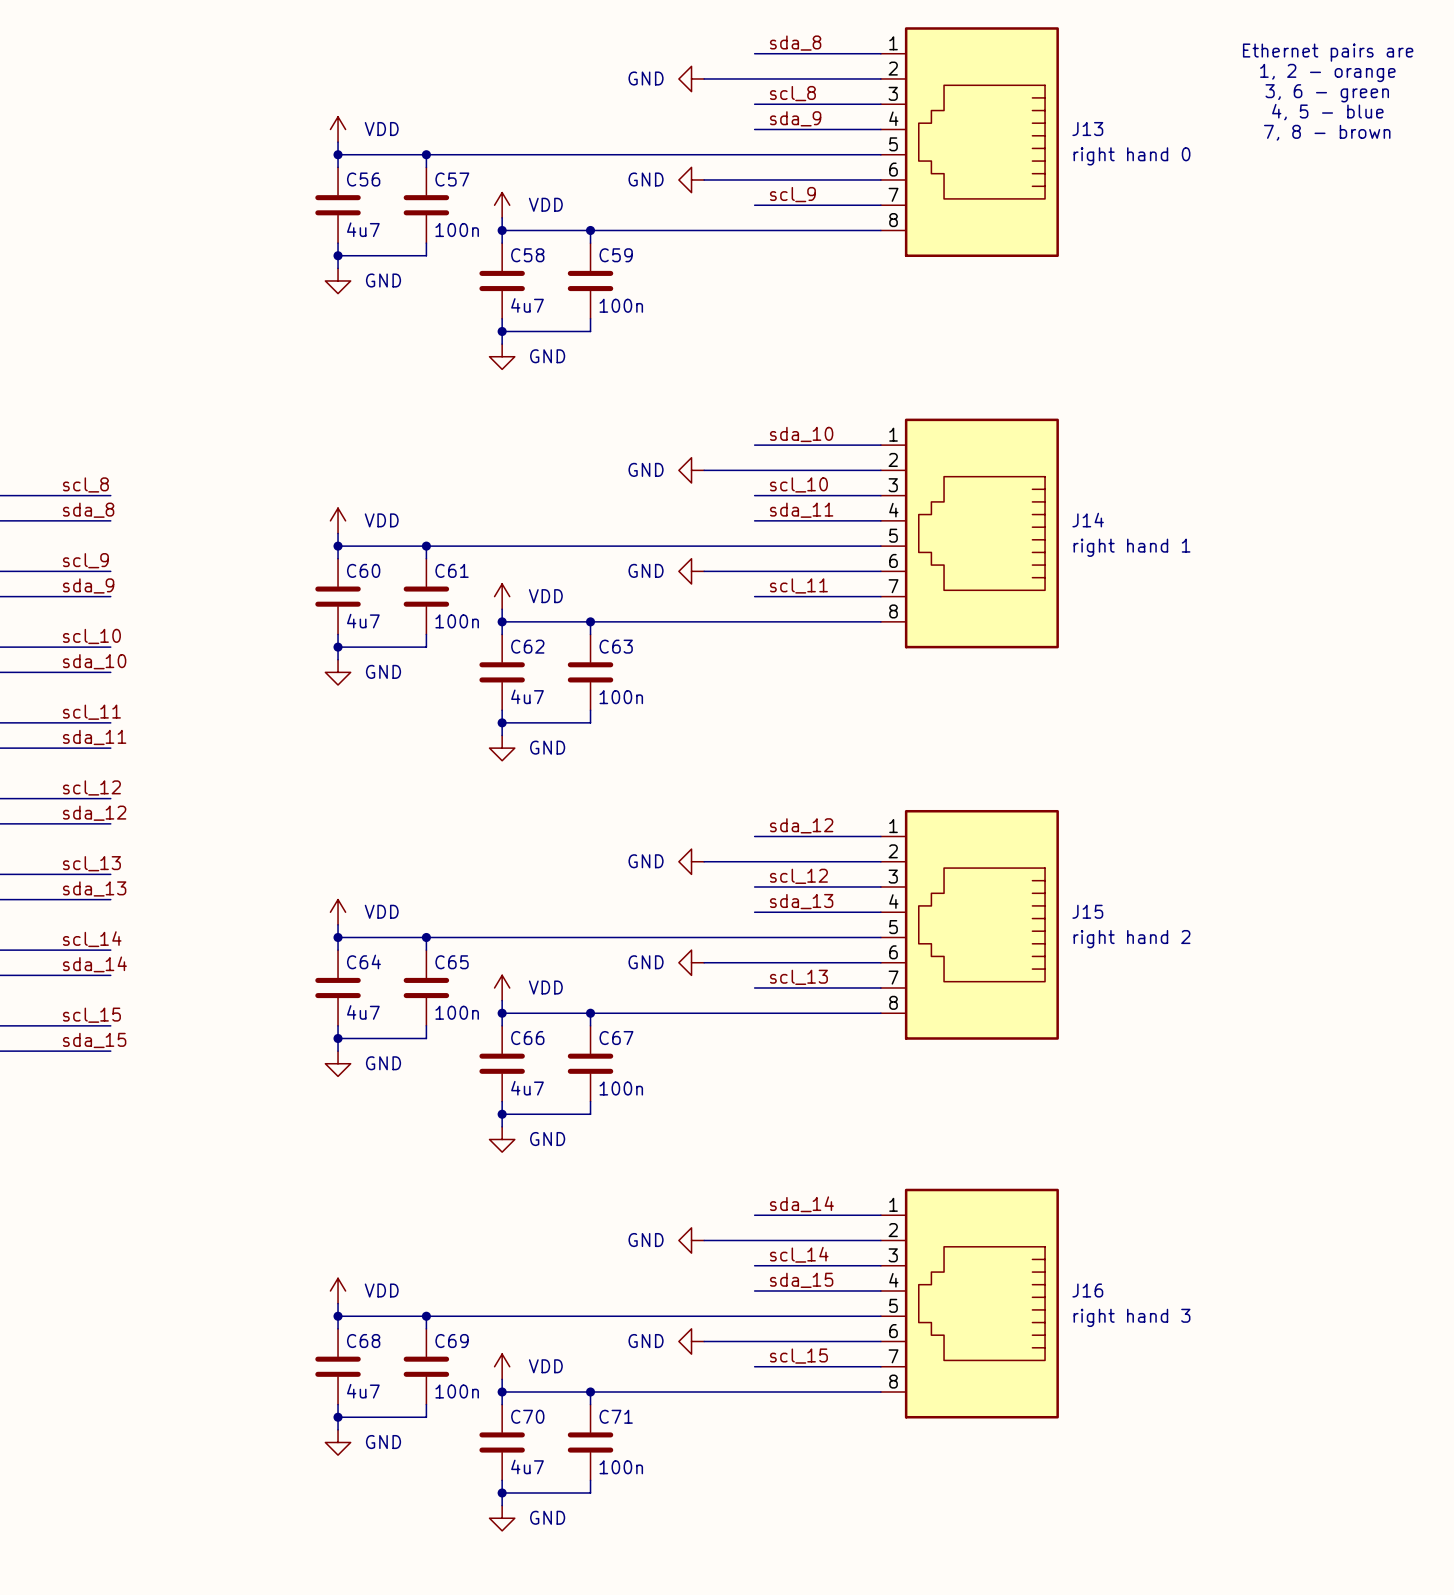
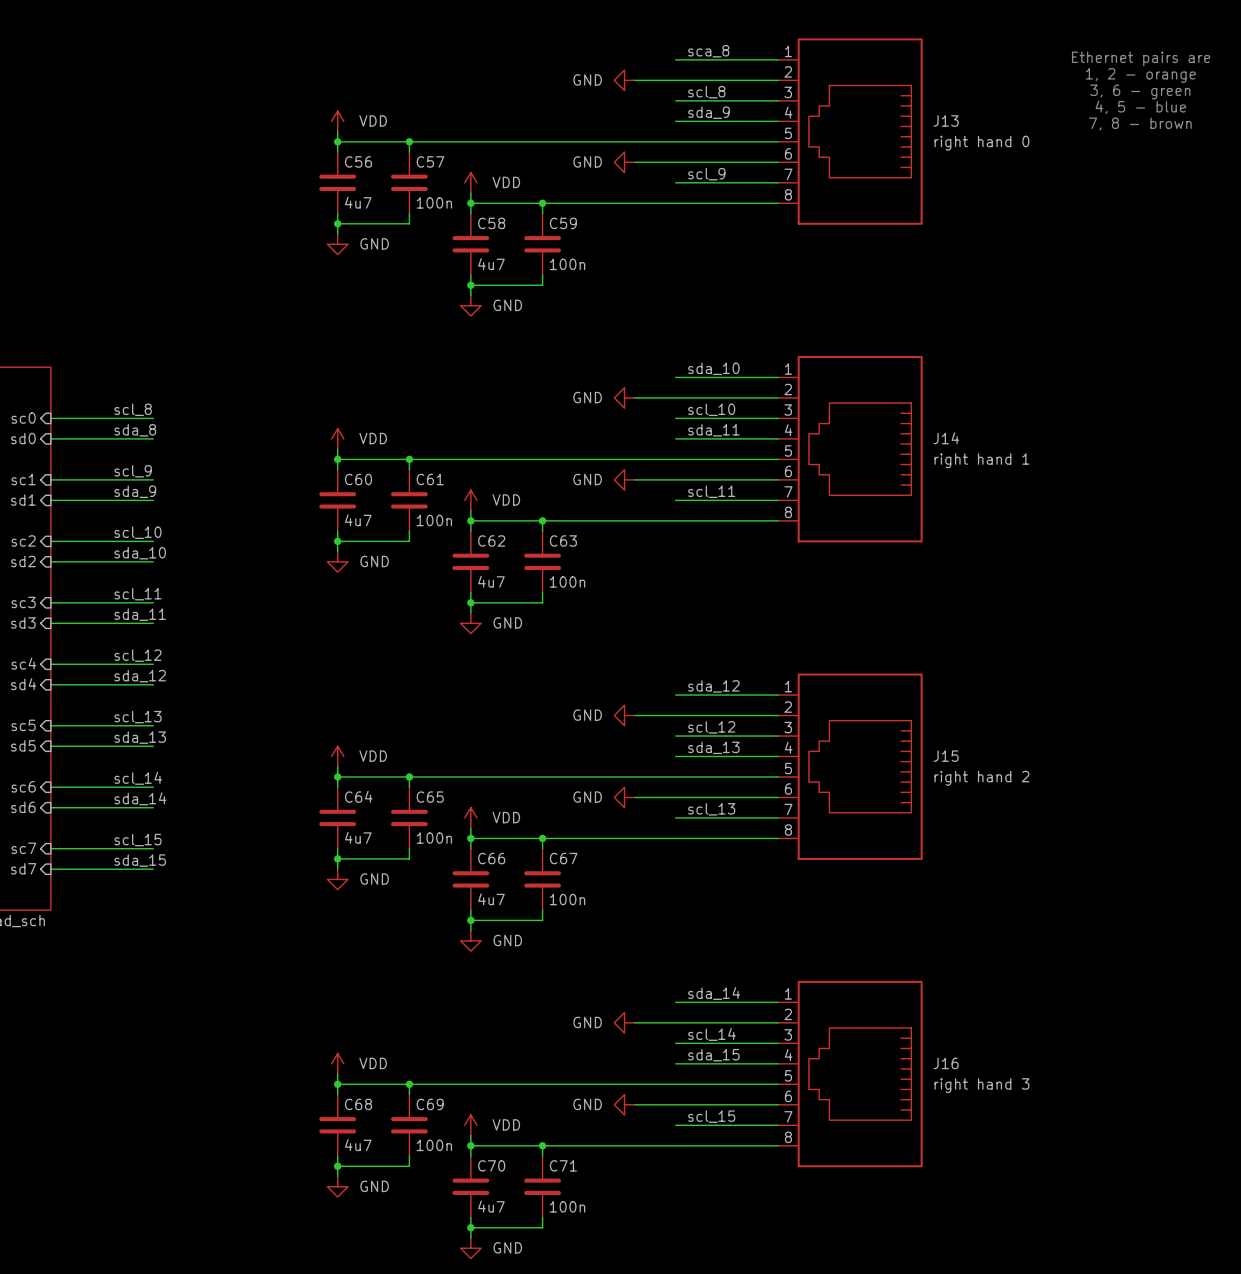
label: sda_8 (795, 43) -> sca_8 (708, 51)

